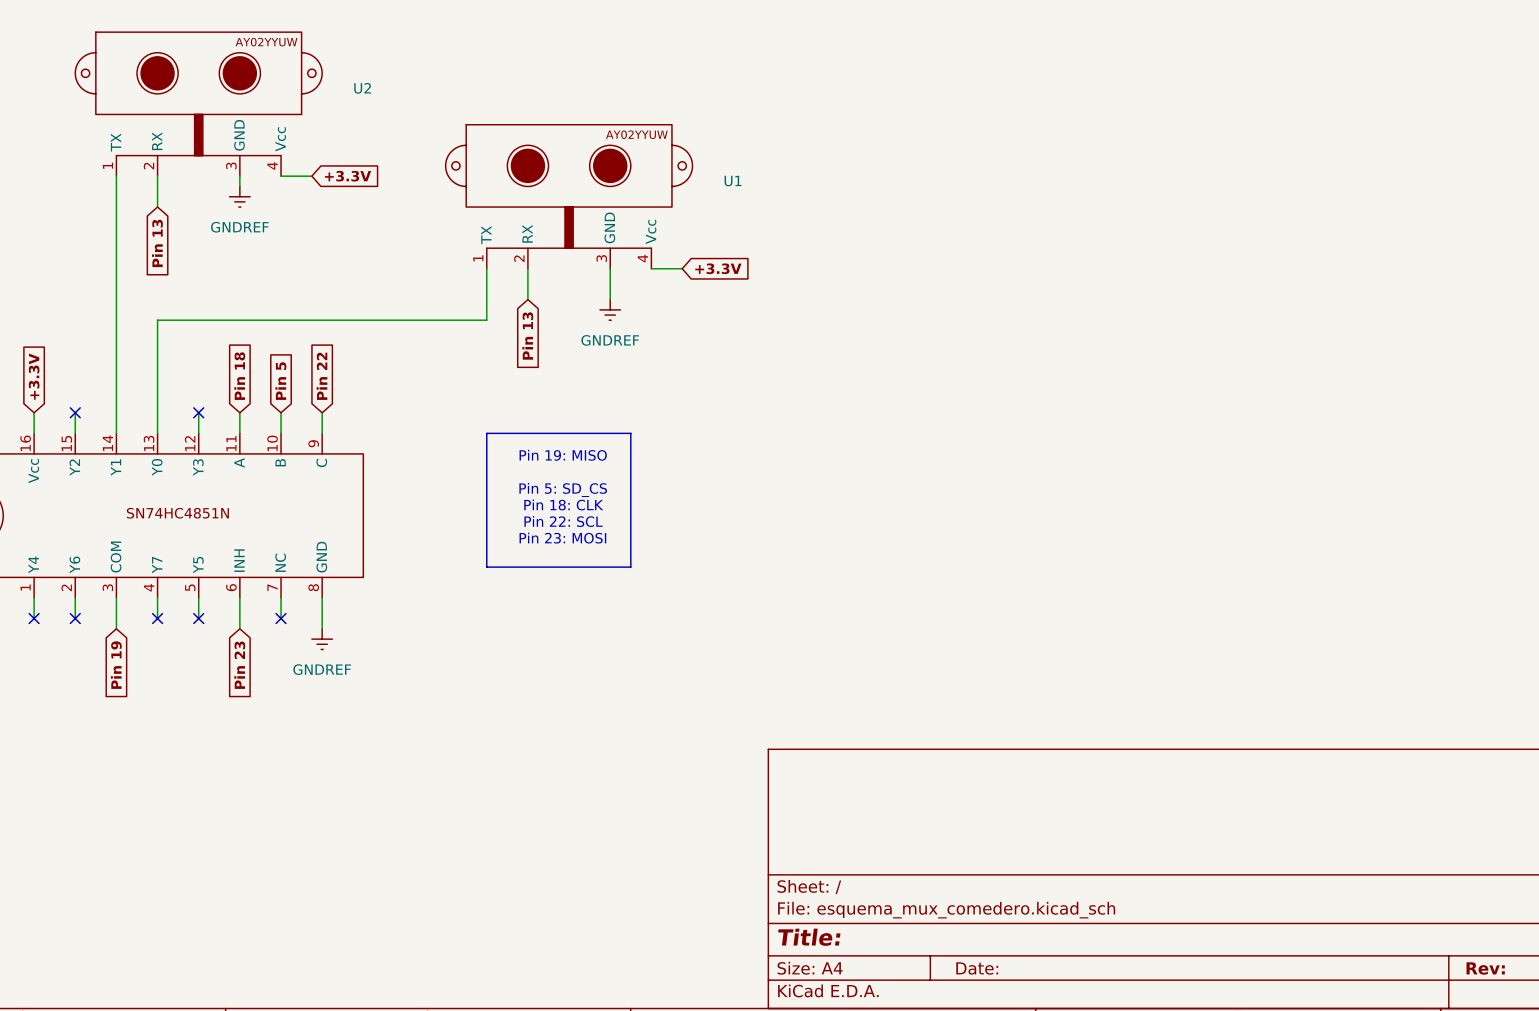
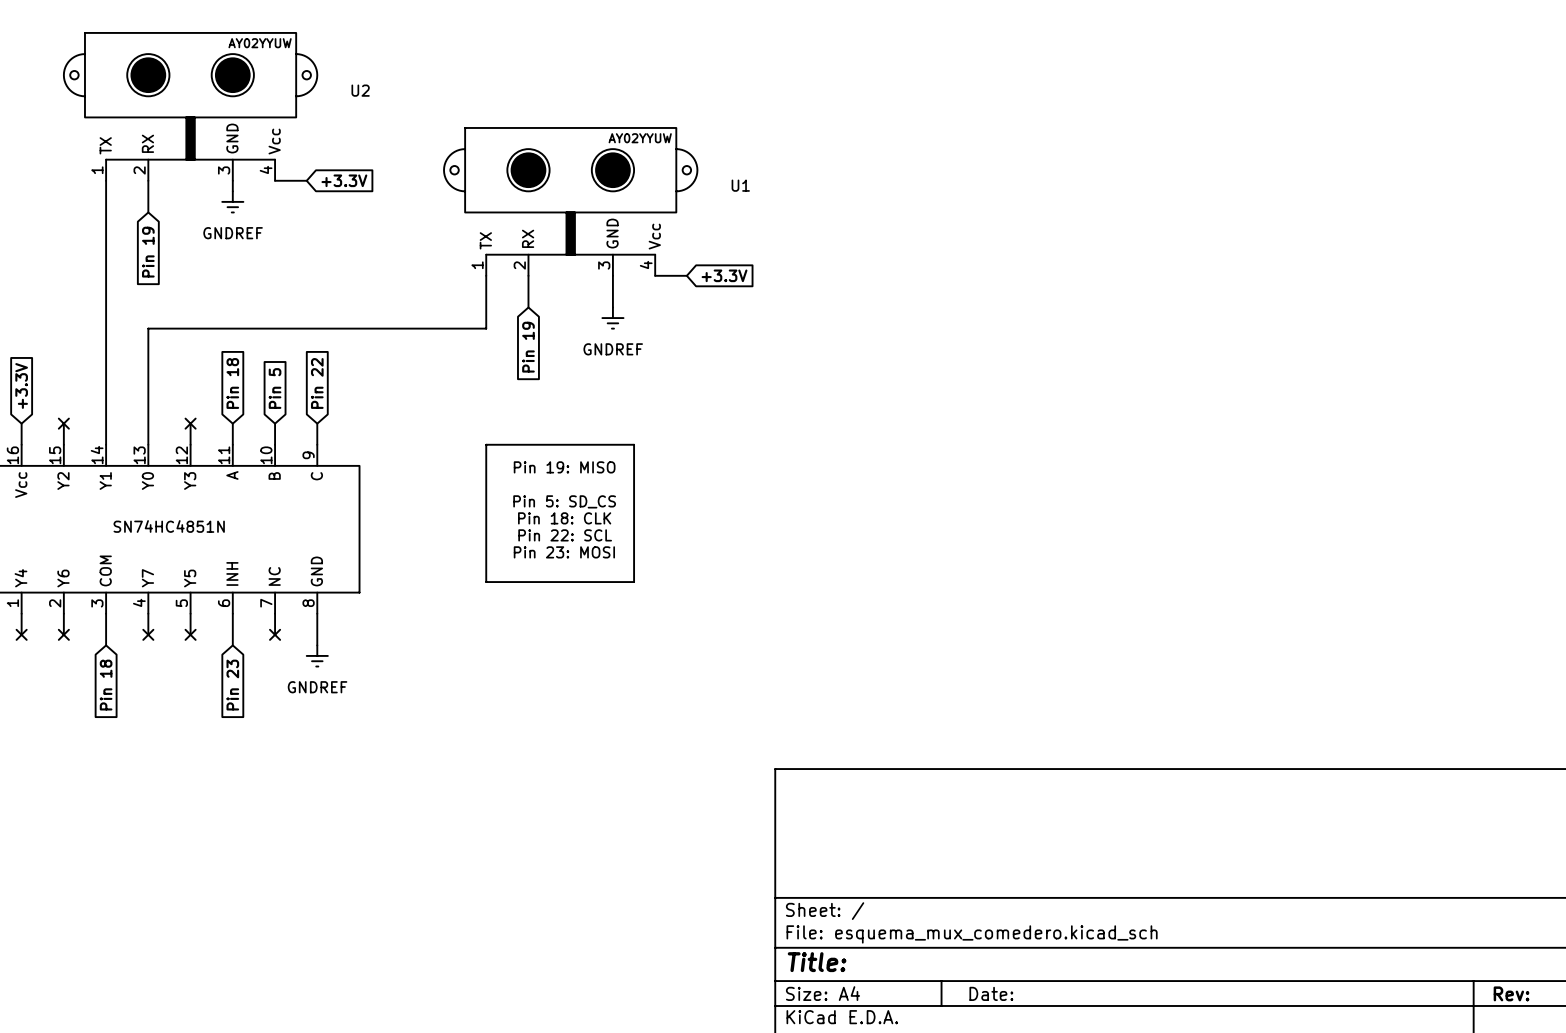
global label: Pin 13 (157, 243) -> Pin 19 (148, 252)
global label: Pin 13 (527, 336) -> Pin 19 (528, 347)
global label: Pin 19 (116, 665) -> Pin 18 (106, 685)

